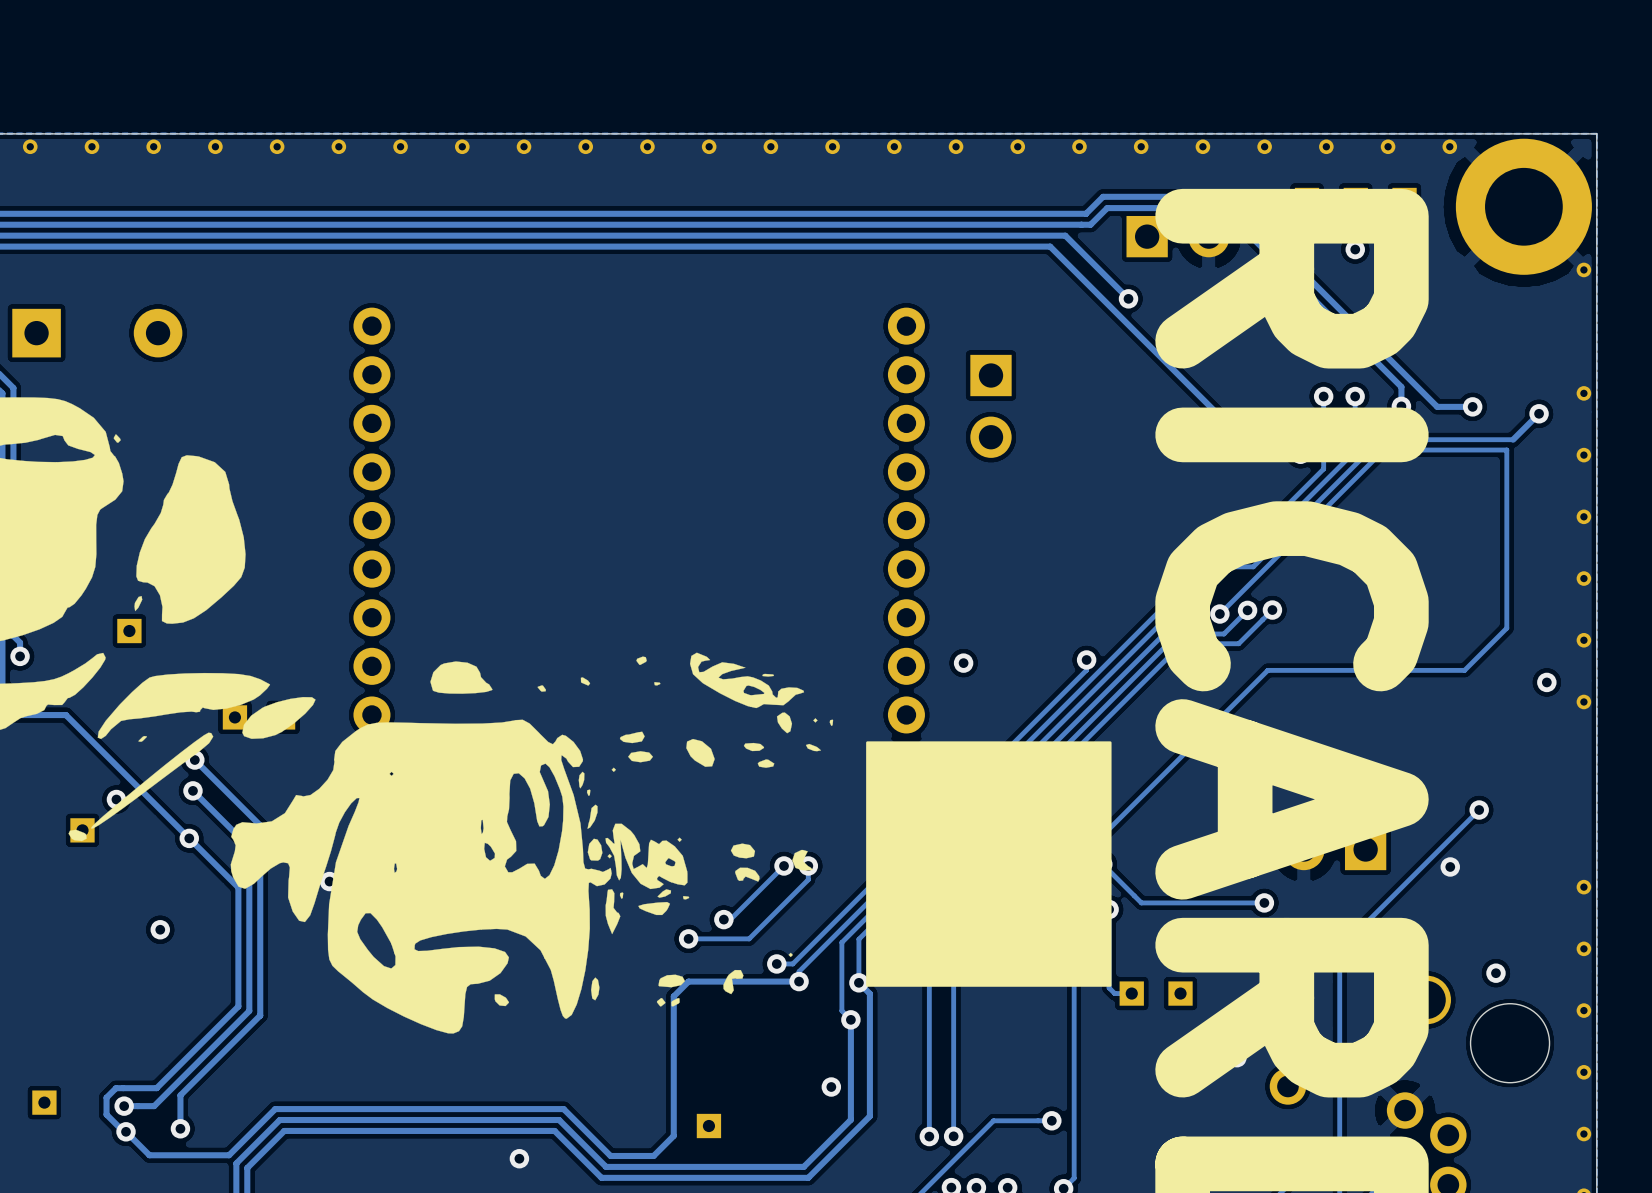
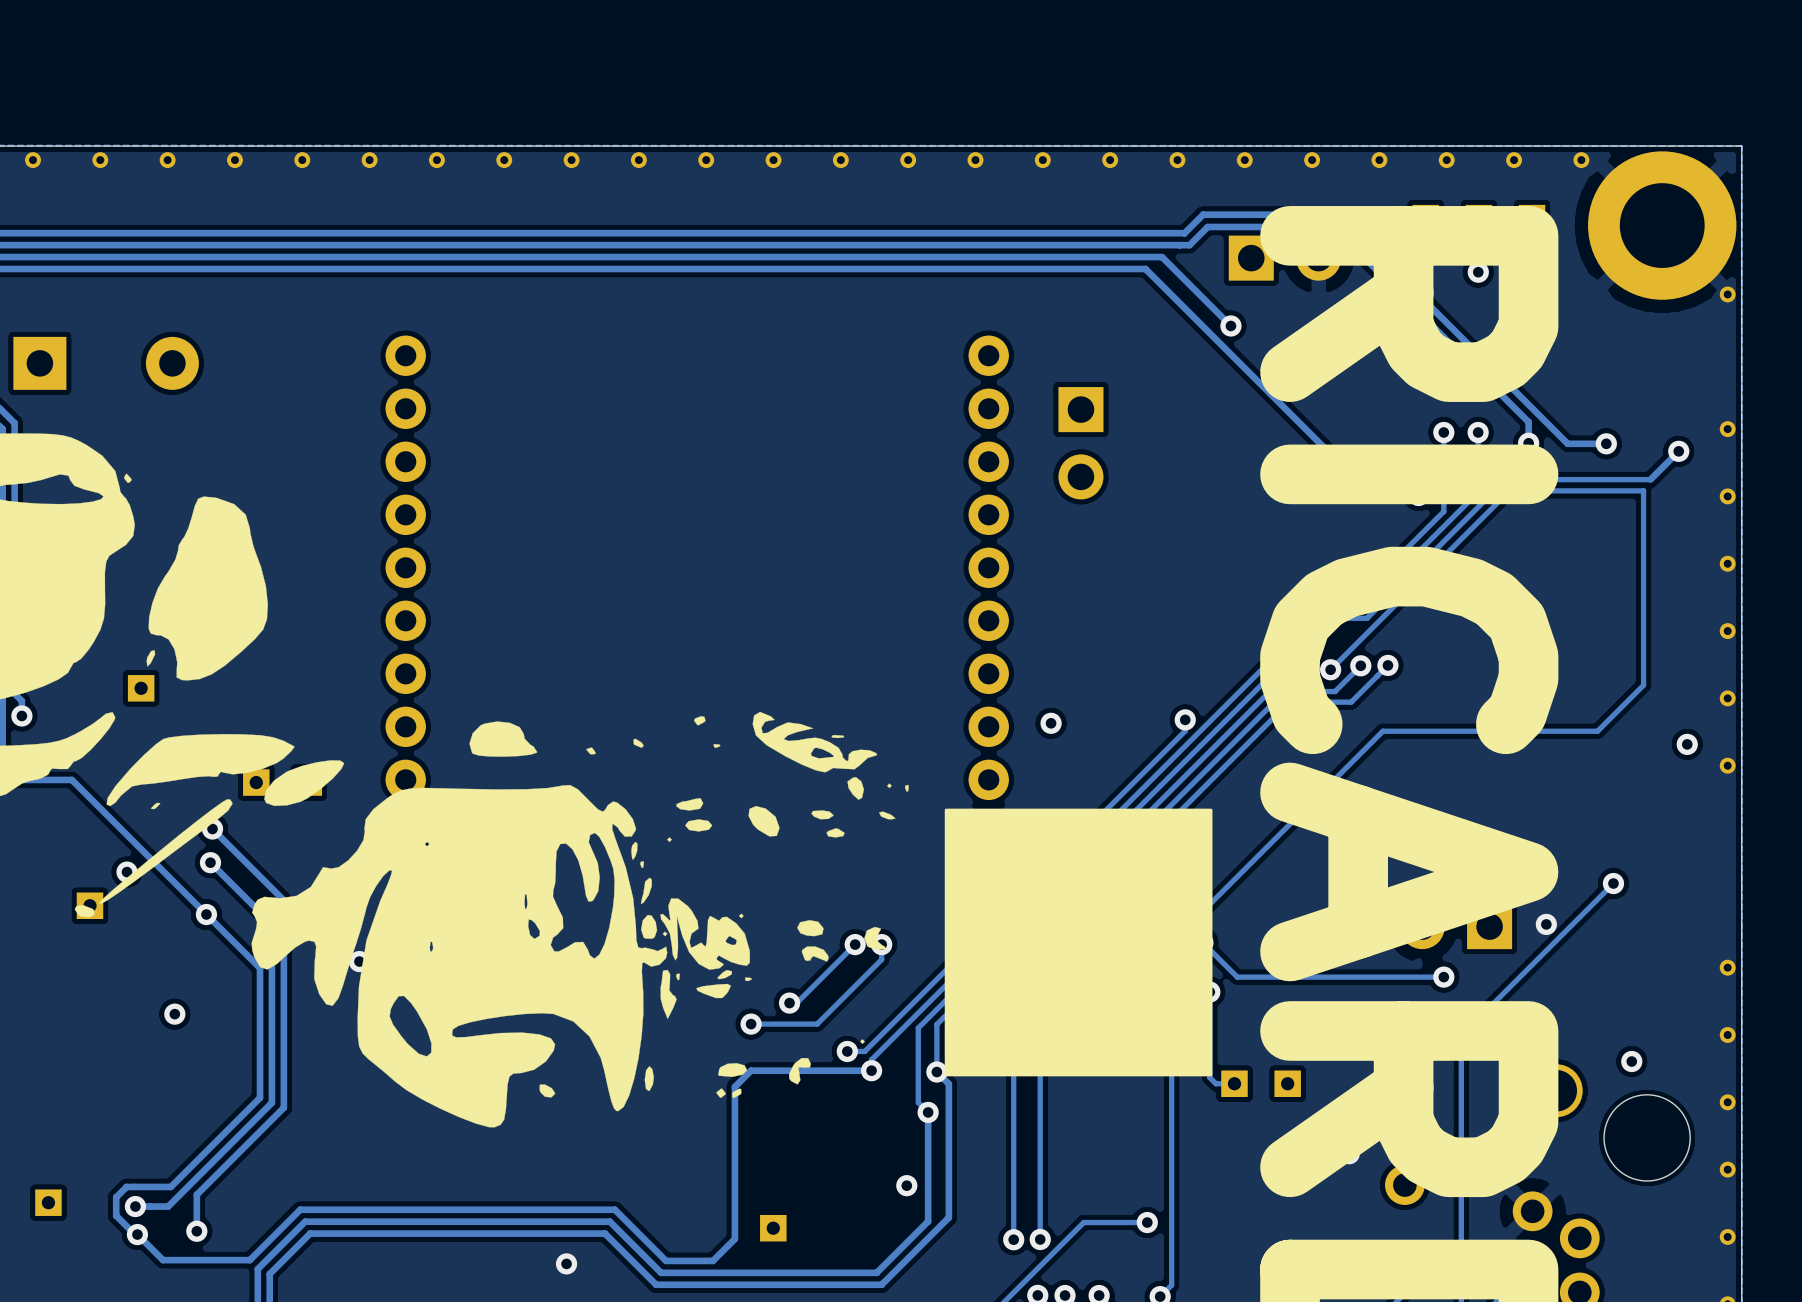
via position: (1450, 866) -> (1546, 924)
track: (1134, 895) (1141, 902) (1264, 902) -> (1237, 977) (1443, 977)
via position: (1264, 902) -> (1443, 977)

